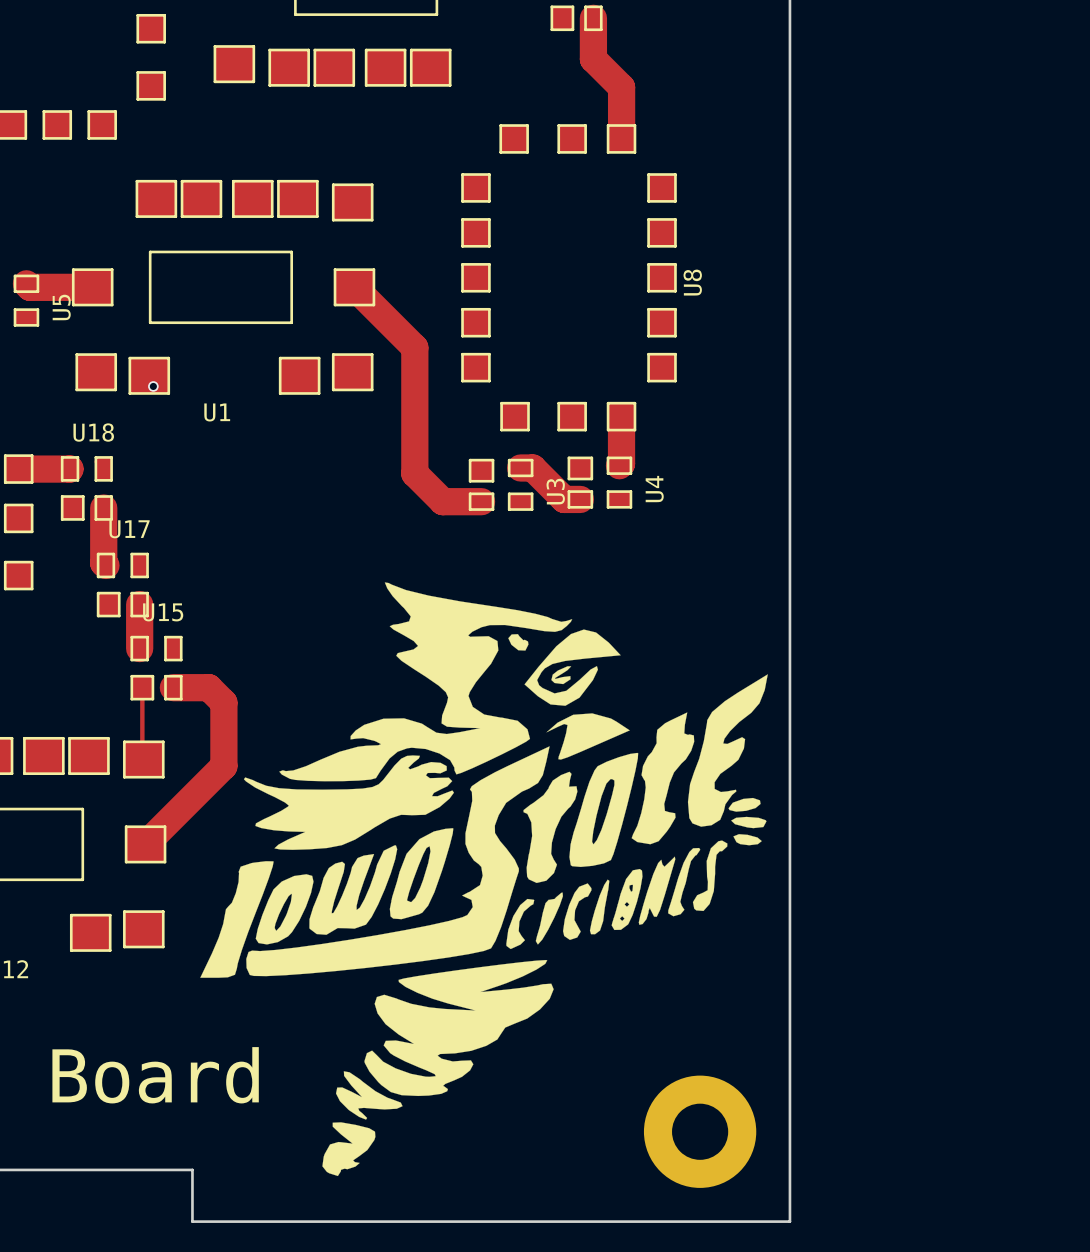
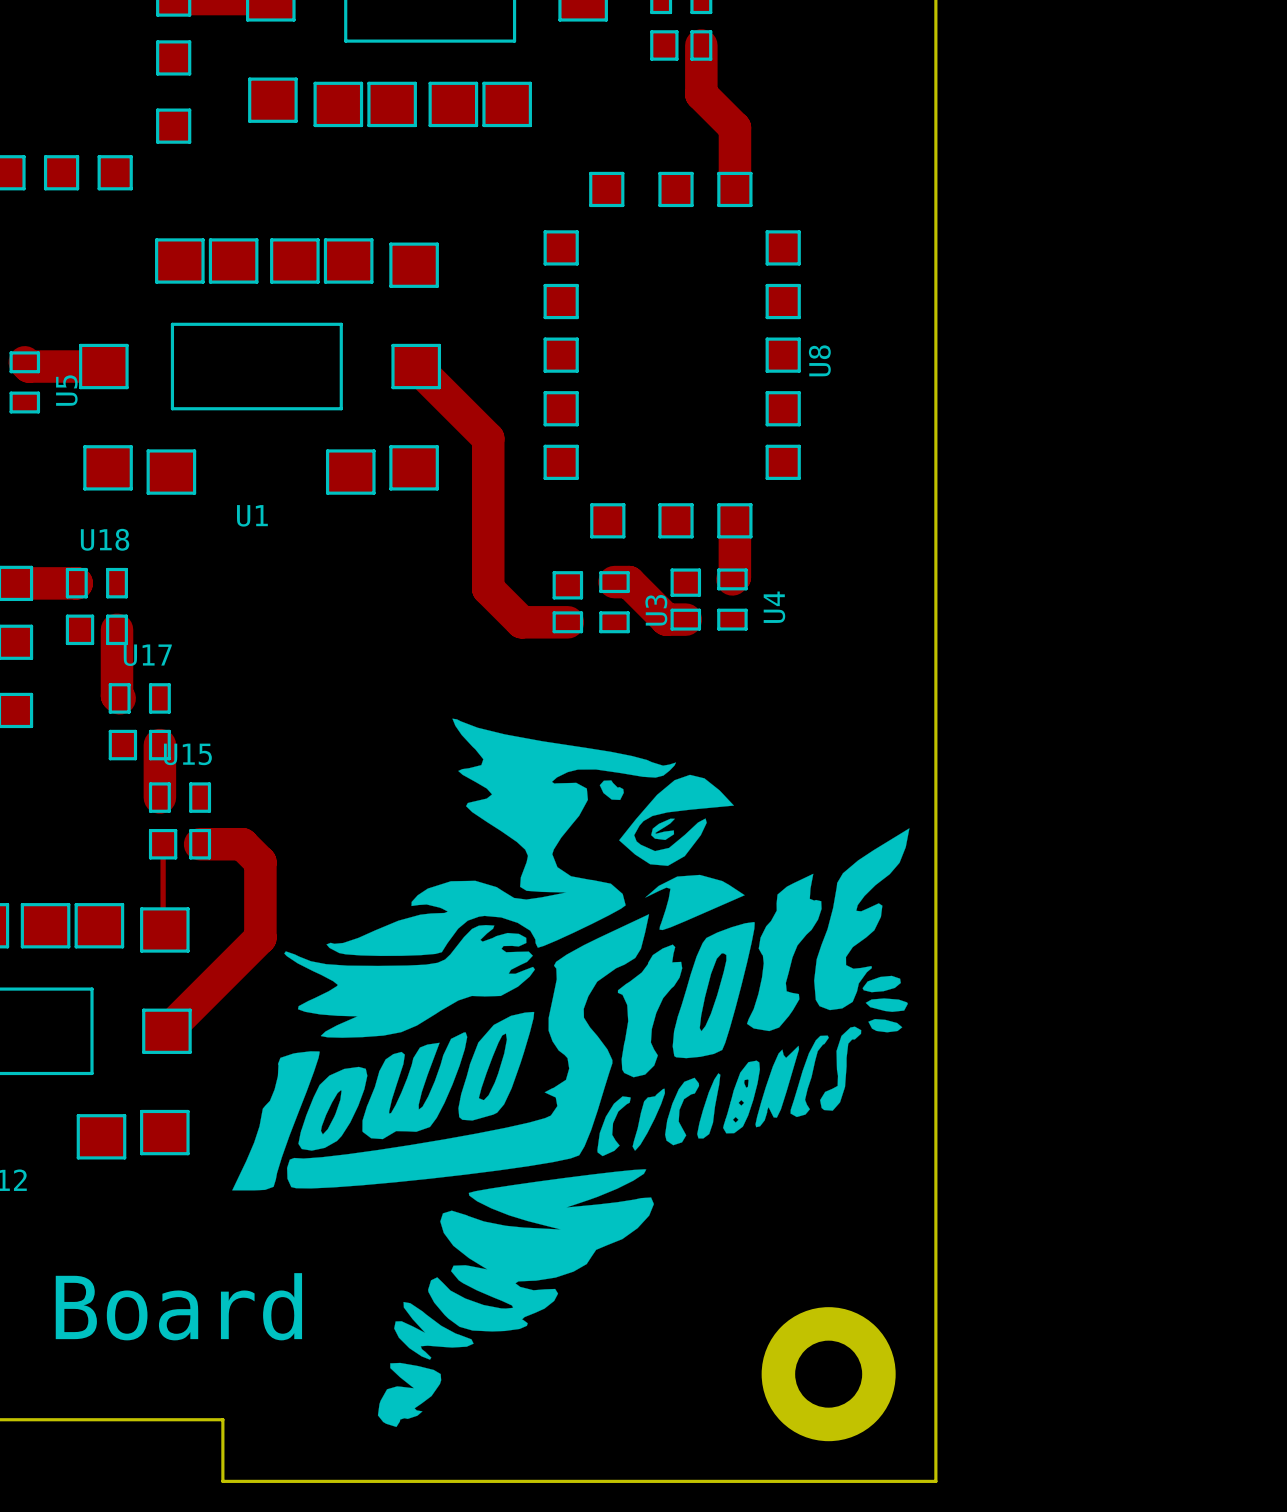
via: (153, 386) -> none

